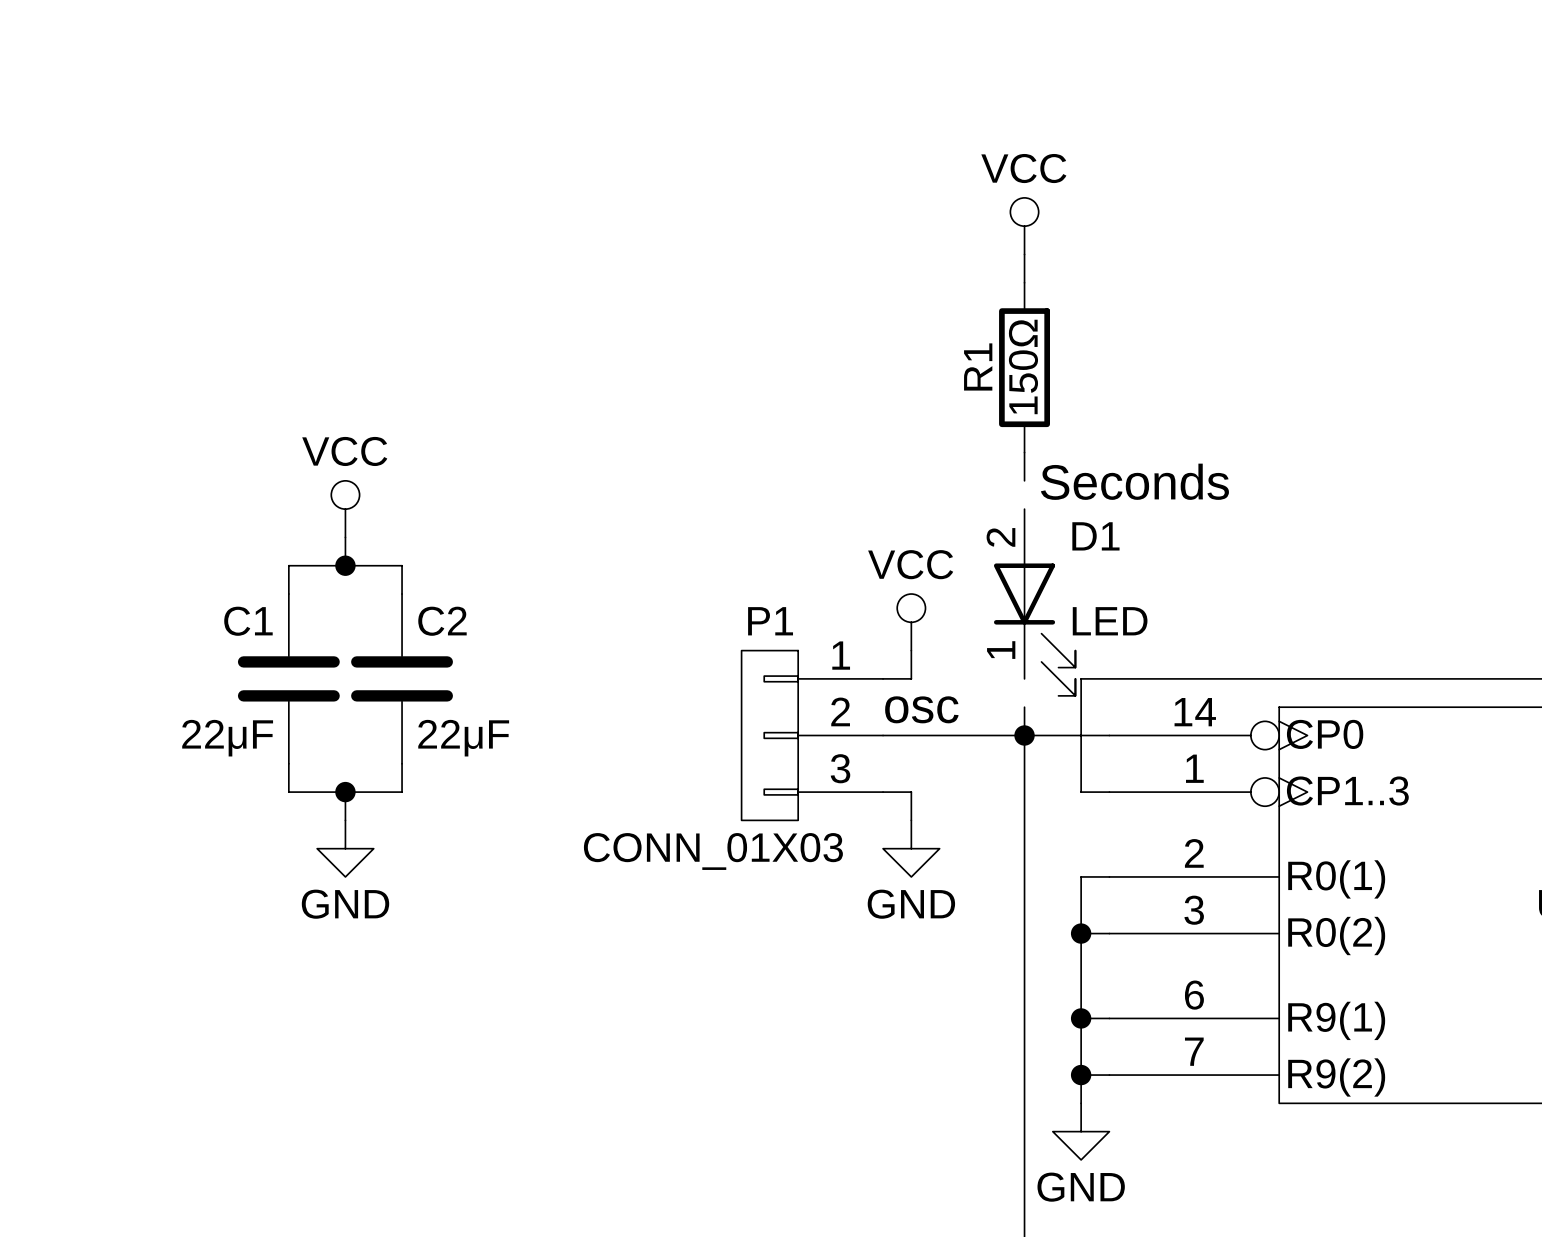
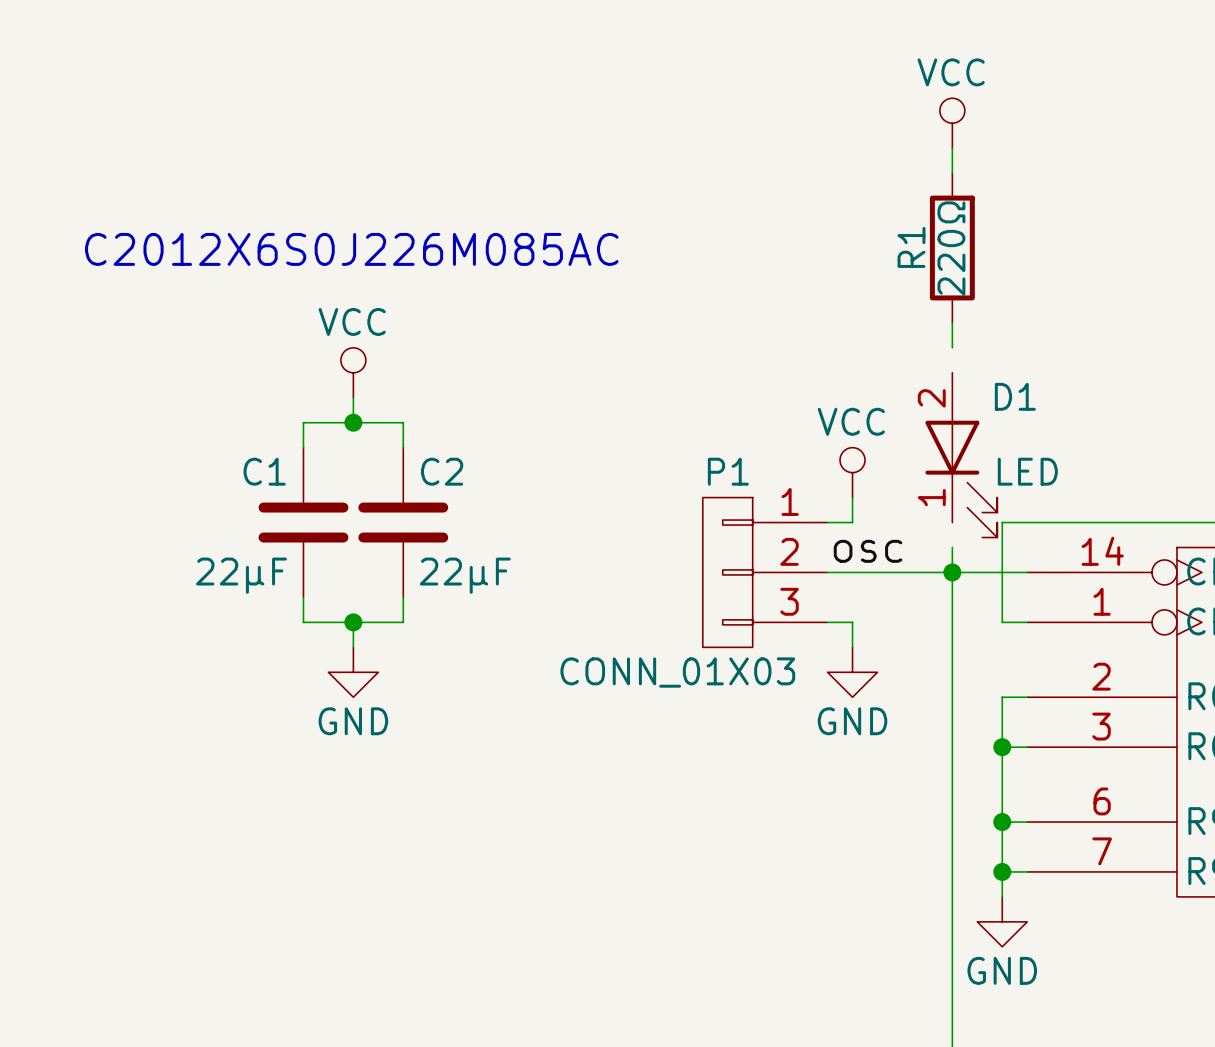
R1 value: 150Ω (1023, 366) -> 220Ω (951, 248)
text: none -> C2012X6S0J226M085AC (351, 249)
text: Seconds (1134, 481) -> none

